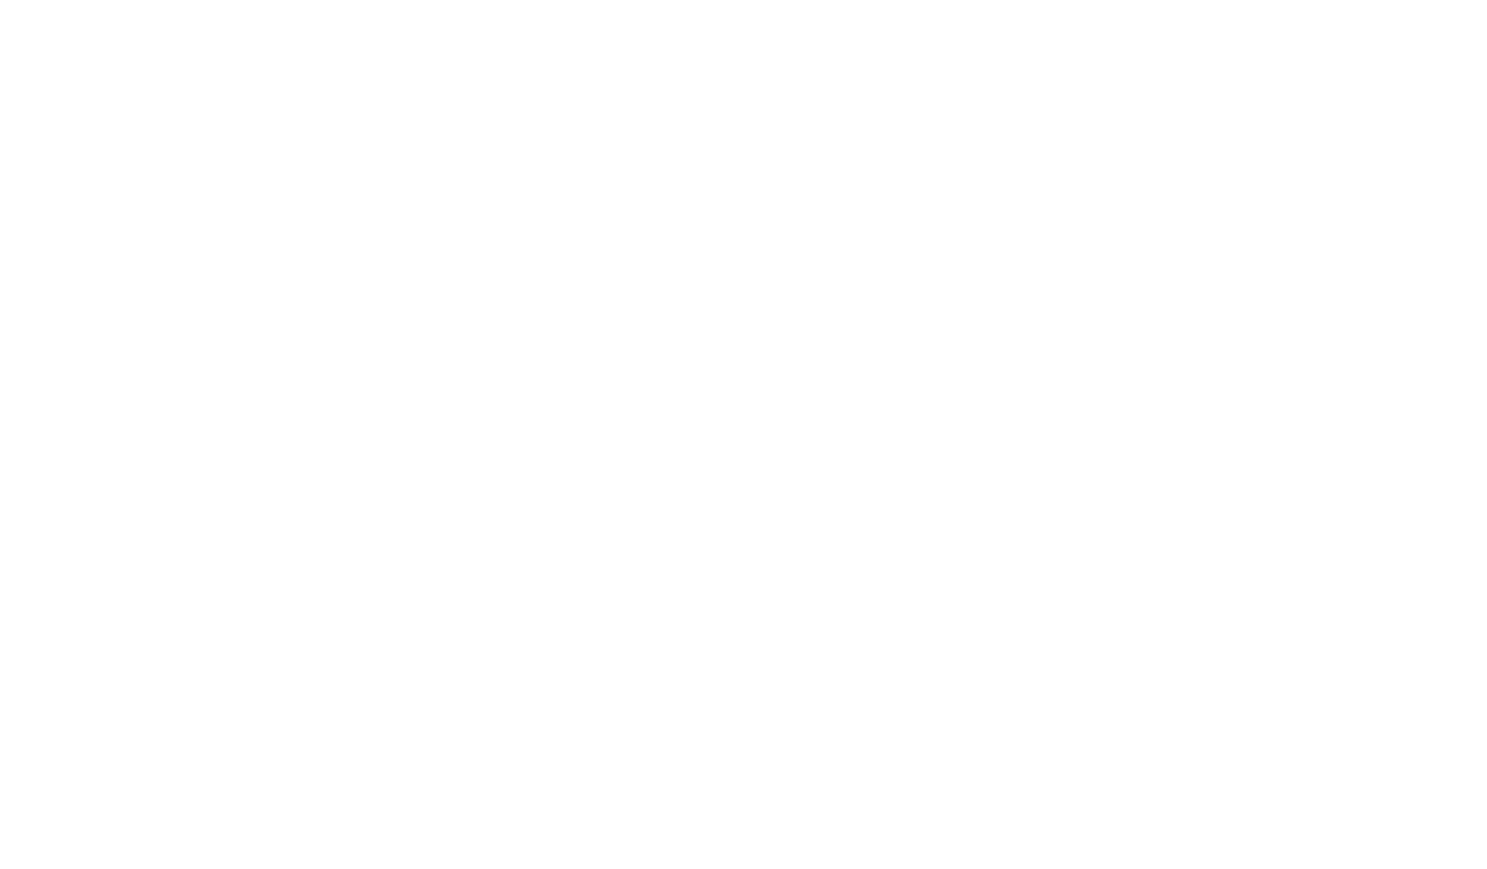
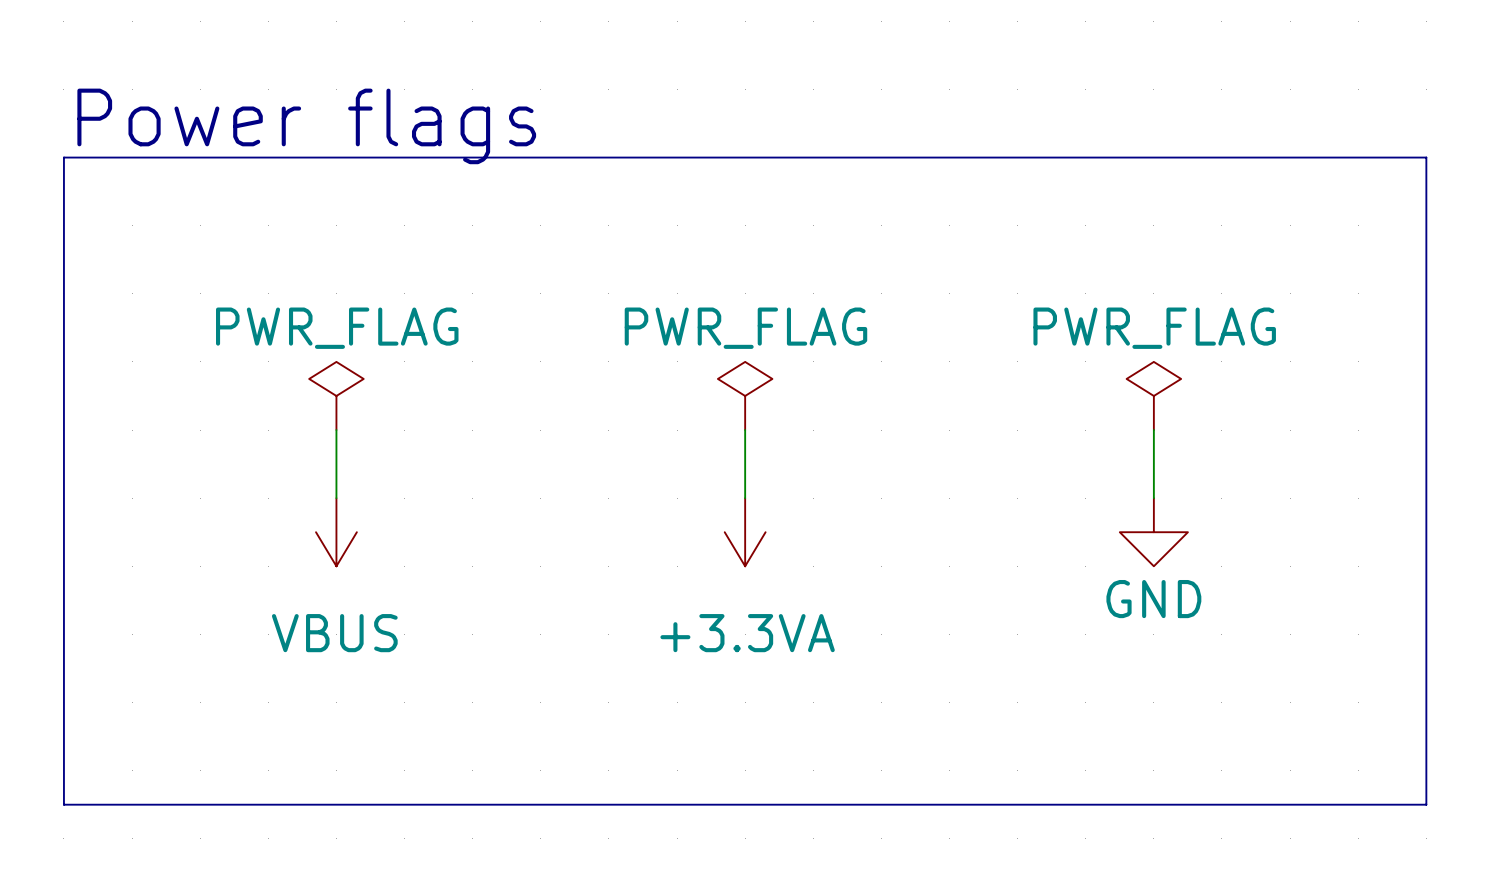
text: none -> Power flags (306, 126)
line: none -> (63, 157) (1426, 157) (1426, 804) (63, 804) (63, 157)
power symbol: none -> PWR_FLAG (336, 395)
power symbol: none -> PWR_FLAG (745, 395)
power symbol: none -> PWR_FLAG (1153, 395)
wire: none -> (336, 430) (336, 498)
wire: none -> (745, 430) (745, 498)
wire: none -> (1153, 430) (1153, 498)
power symbol: none -> VBUS (336, 532)
power symbol: none -> +3.3VA (745, 532)
power symbol: none -> GND (1153, 532)

